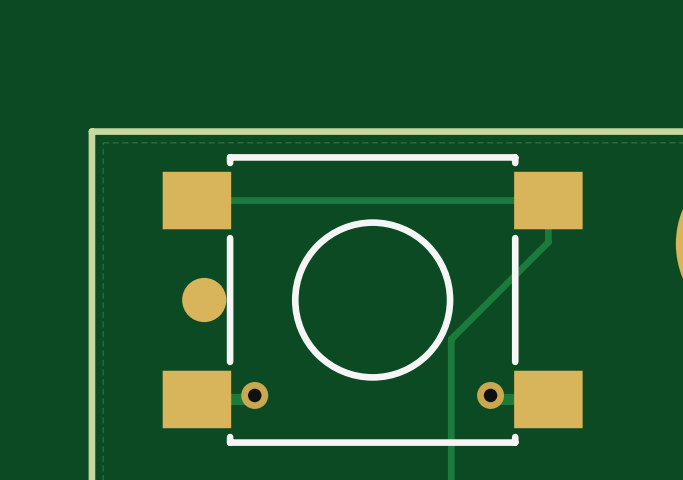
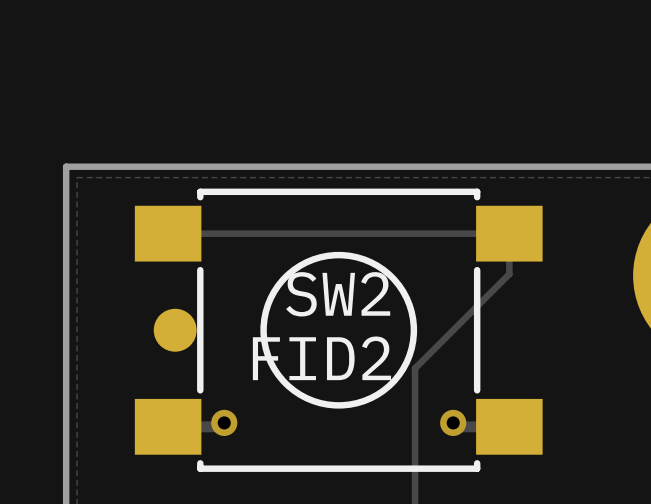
SW2 name: none -> SW2 (338, 294)
FID2 name: none -> FID2 (321, 358)

